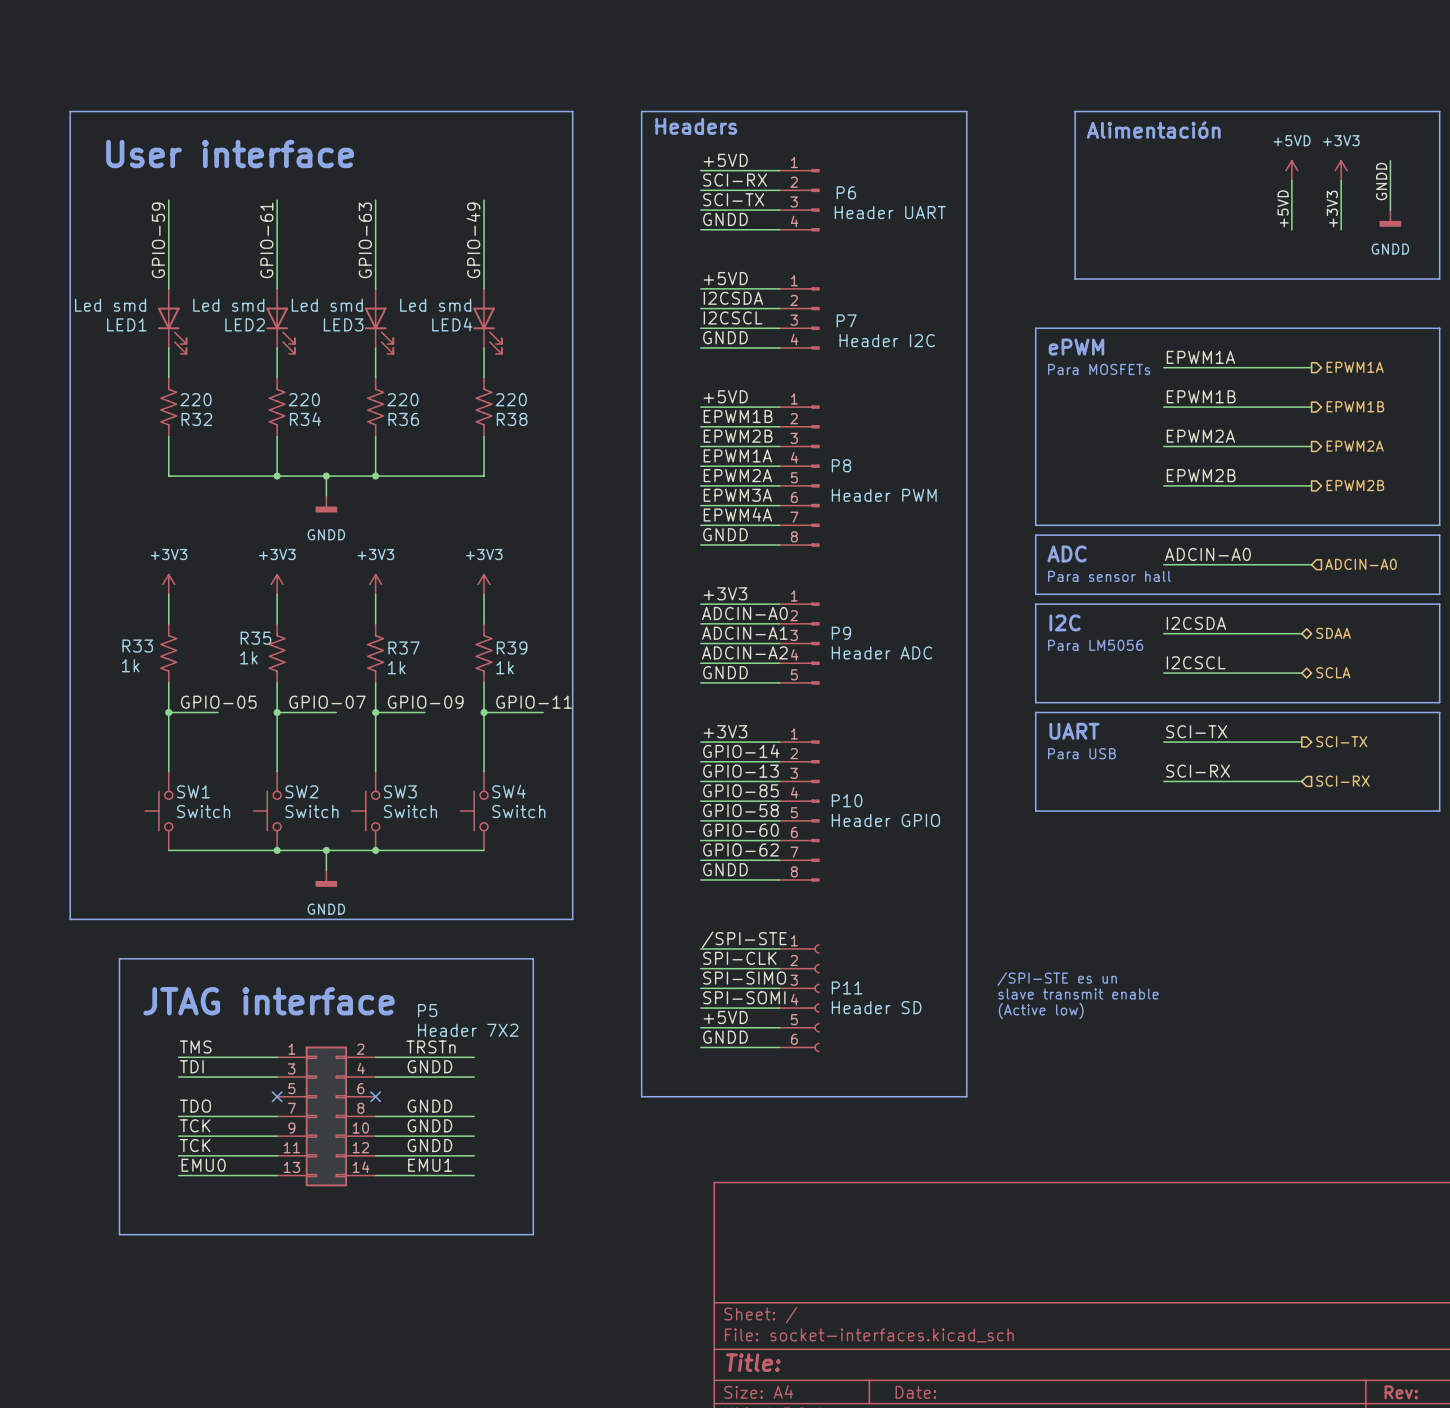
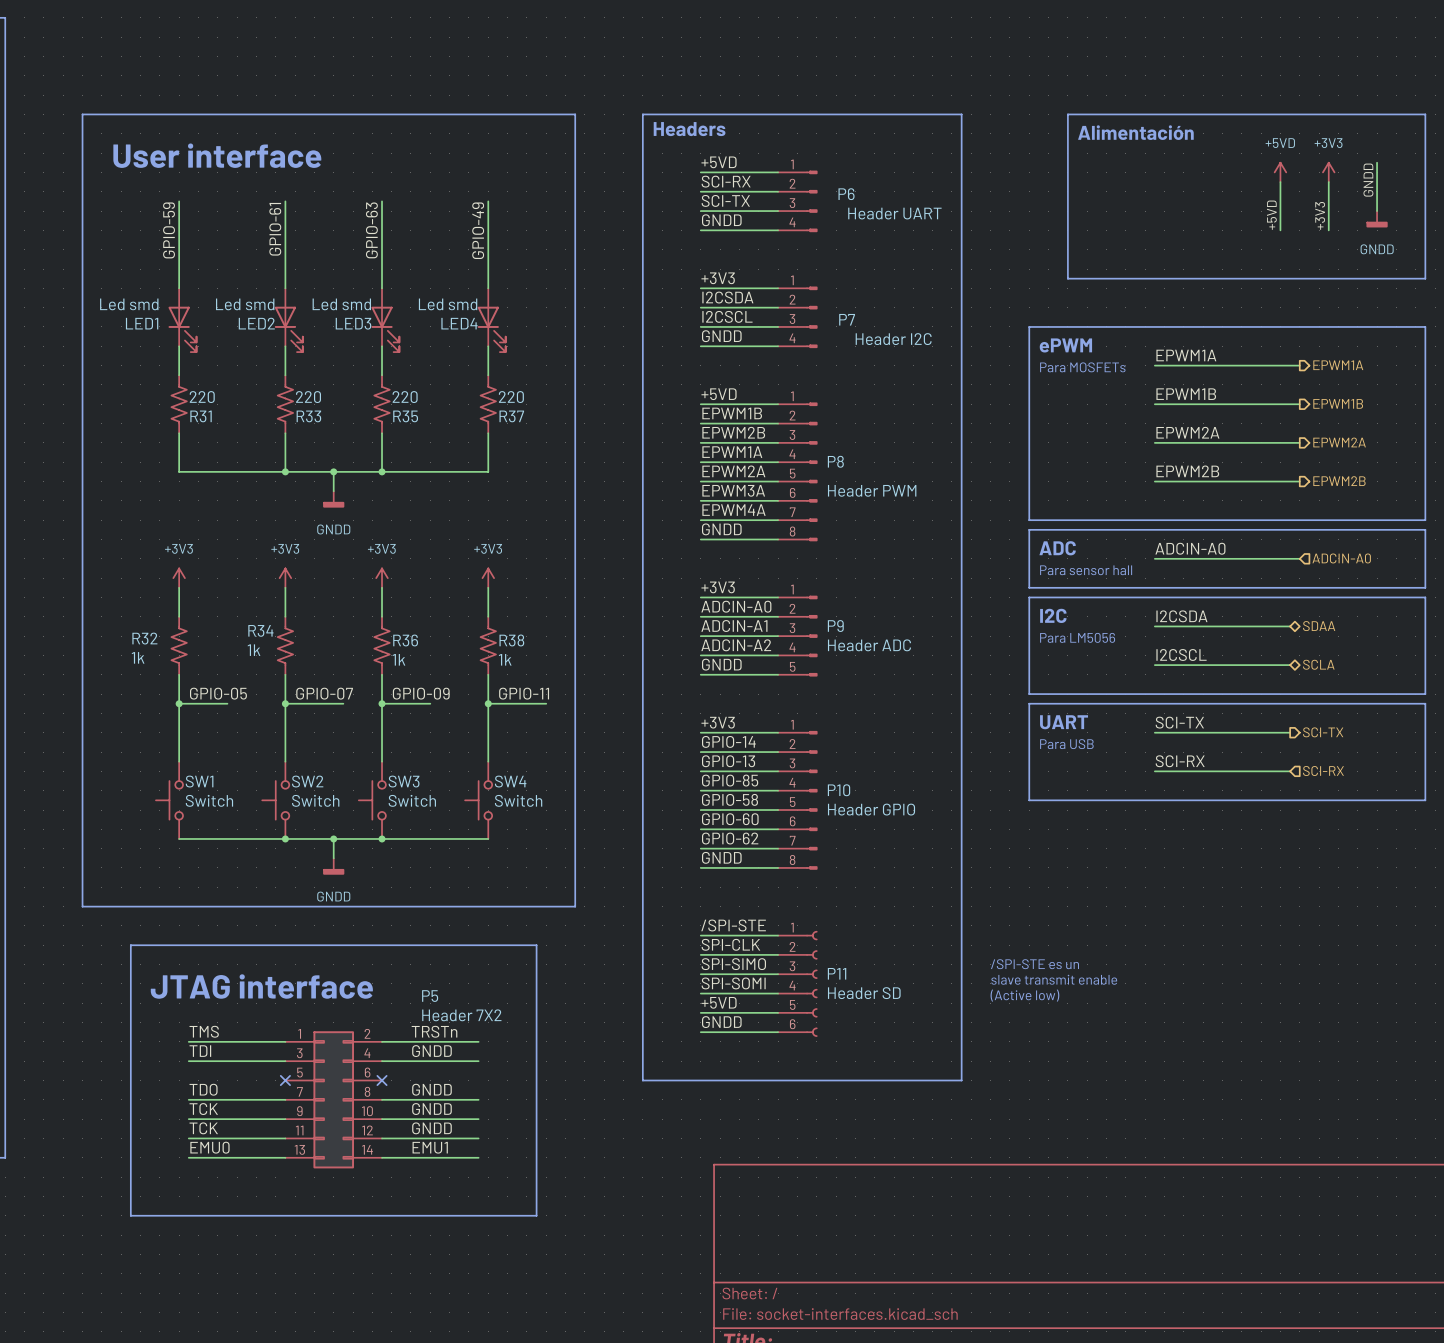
label: +5VD (725, 278) -> +3V3 (718, 278)
R32 name: R32 (196, 419) -> R31 (201, 416)
R34 name: R34 (305, 419) -> R33 (308, 416)
R36 name: R36 (403, 419) -> R35 (405, 416)
R38 name: R38 (512, 419) -> R37 (511, 416)
R35 name: R35 (255, 638) -> R34 (260, 630)
R33 name: R33 (137, 646) -> R32 (144, 638)
R37 name: R37 (404, 648) -> R36 (405, 640)
R39 name: R39 (512, 648) -> R38 (511, 640)

